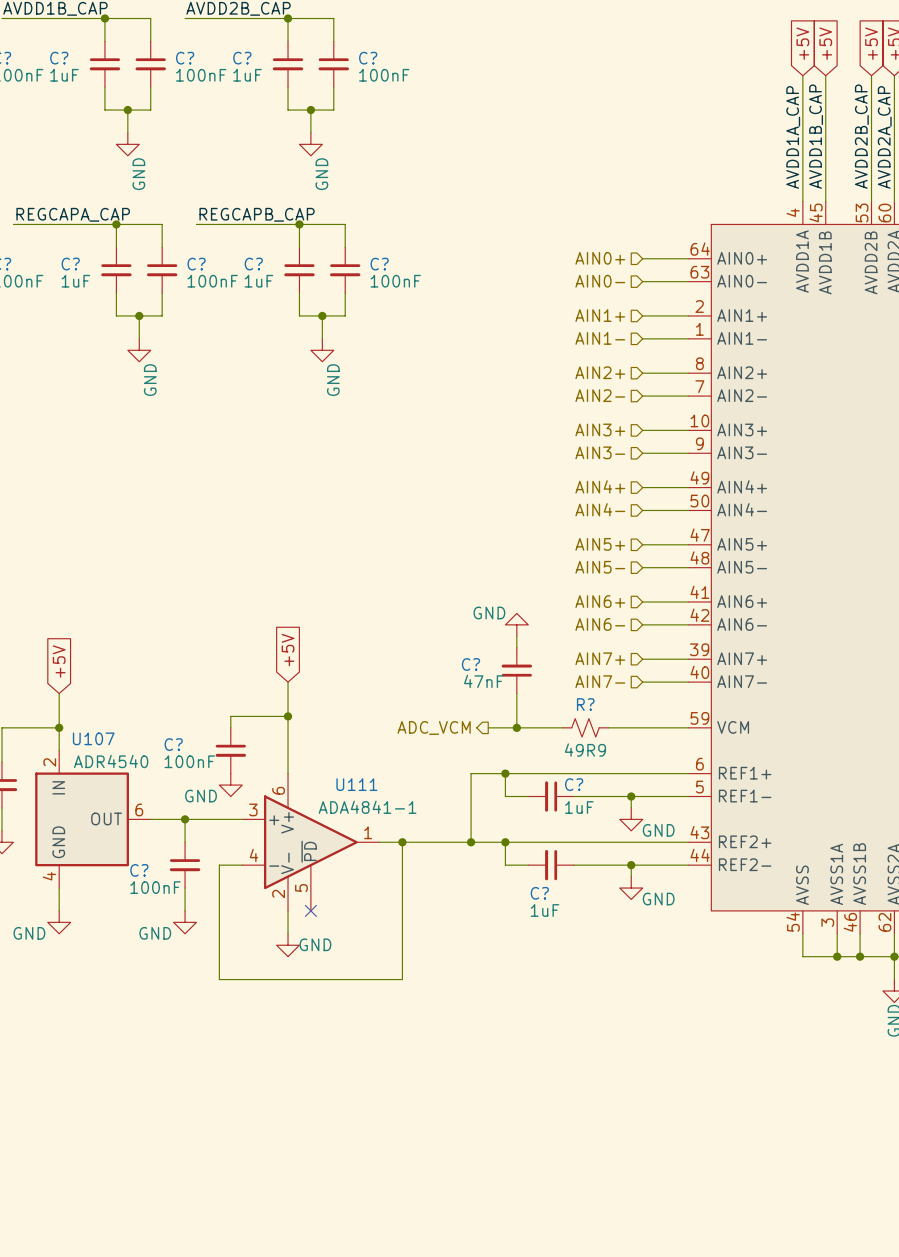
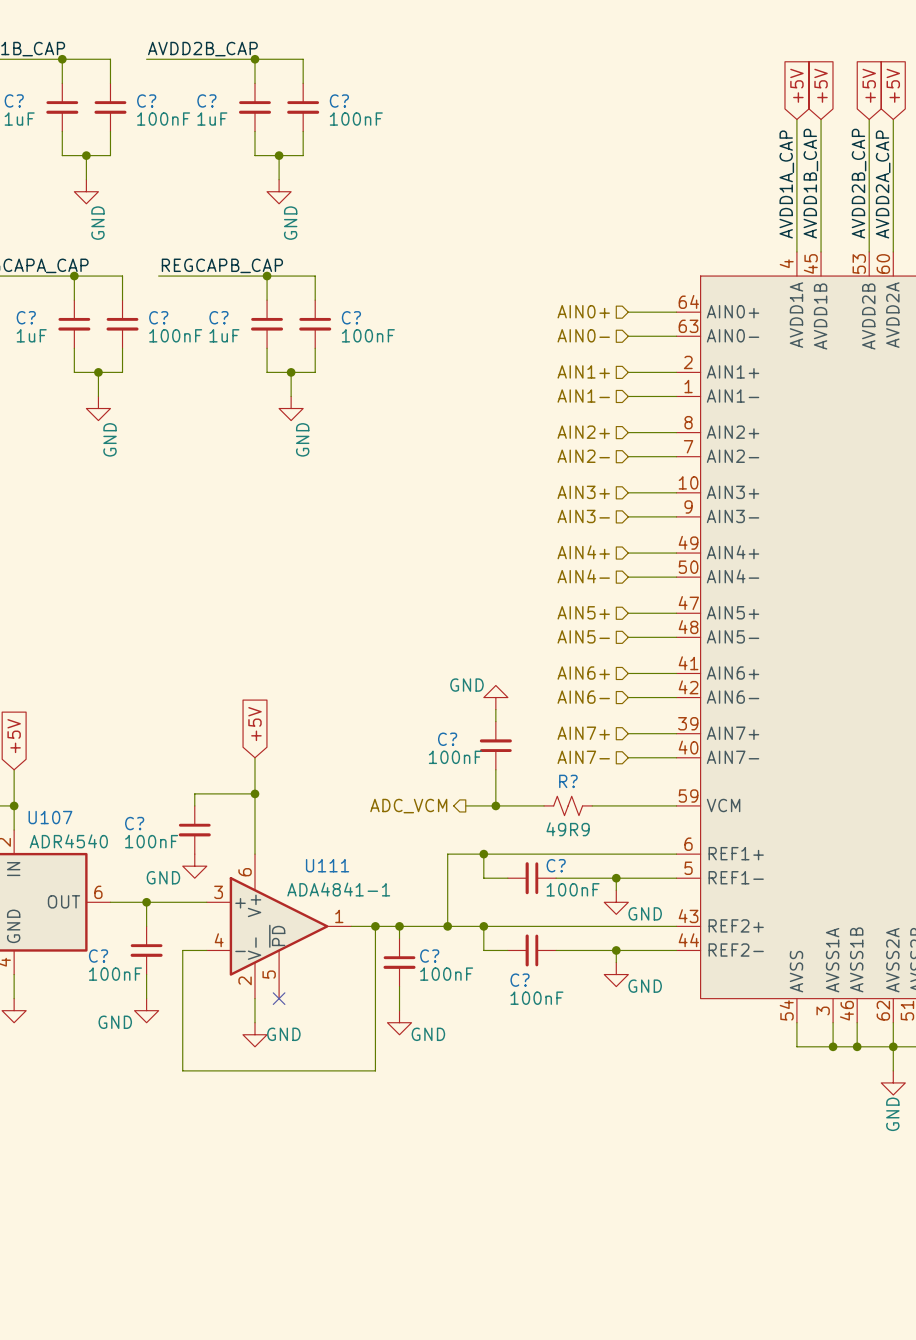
C? value: 47nF (483, 681) -> 100nF (455, 757)
C? value: 1uF (579, 807) -> 100nF (573, 889)
wire: none -> (399, 926) (399, 938)
junction: none -> (399, 926)
C?: none -> 100nF (399, 962)
wire: none -> (399, 986) (399, 1010)
C? value: 1uF (544, 910) -> 100nF (536, 998)
power symbol: none -> GND (399, 1022)

